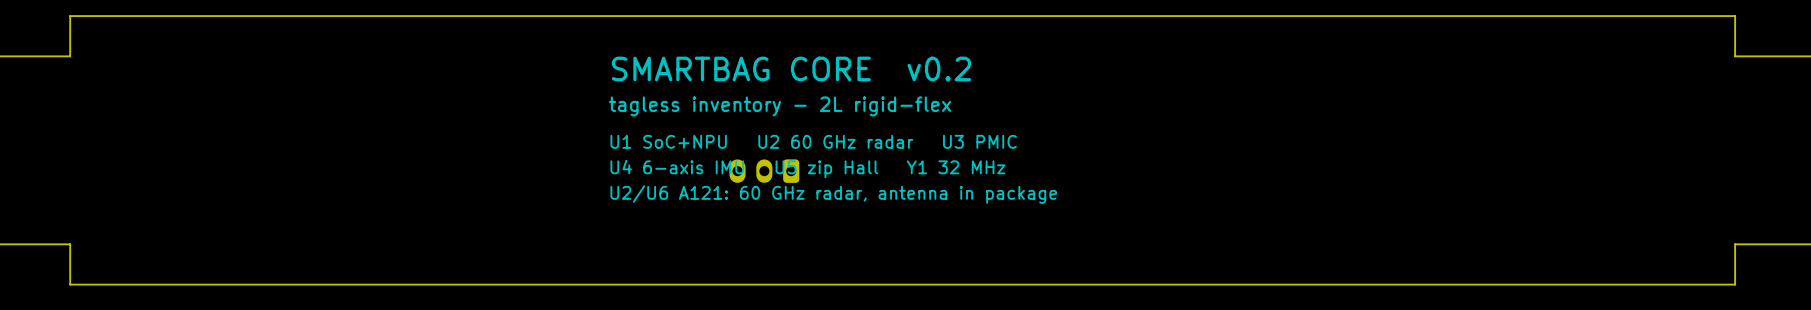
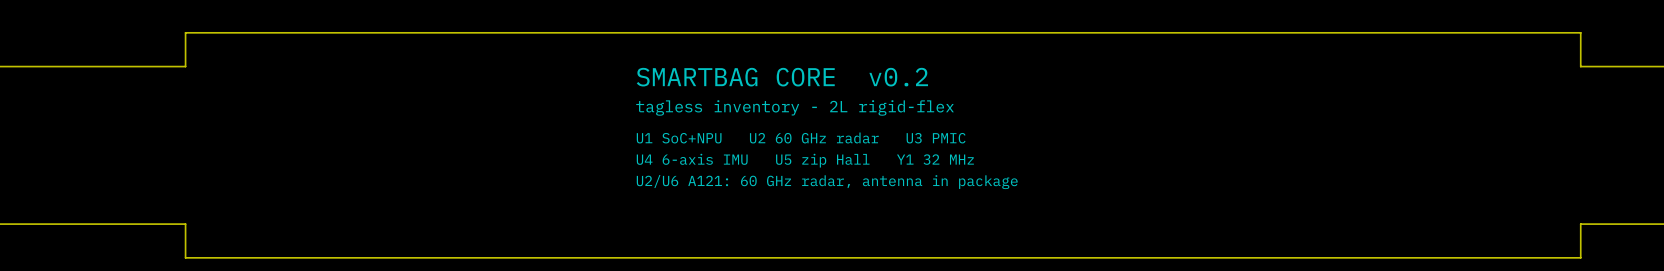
part: (764, 171) -> none

